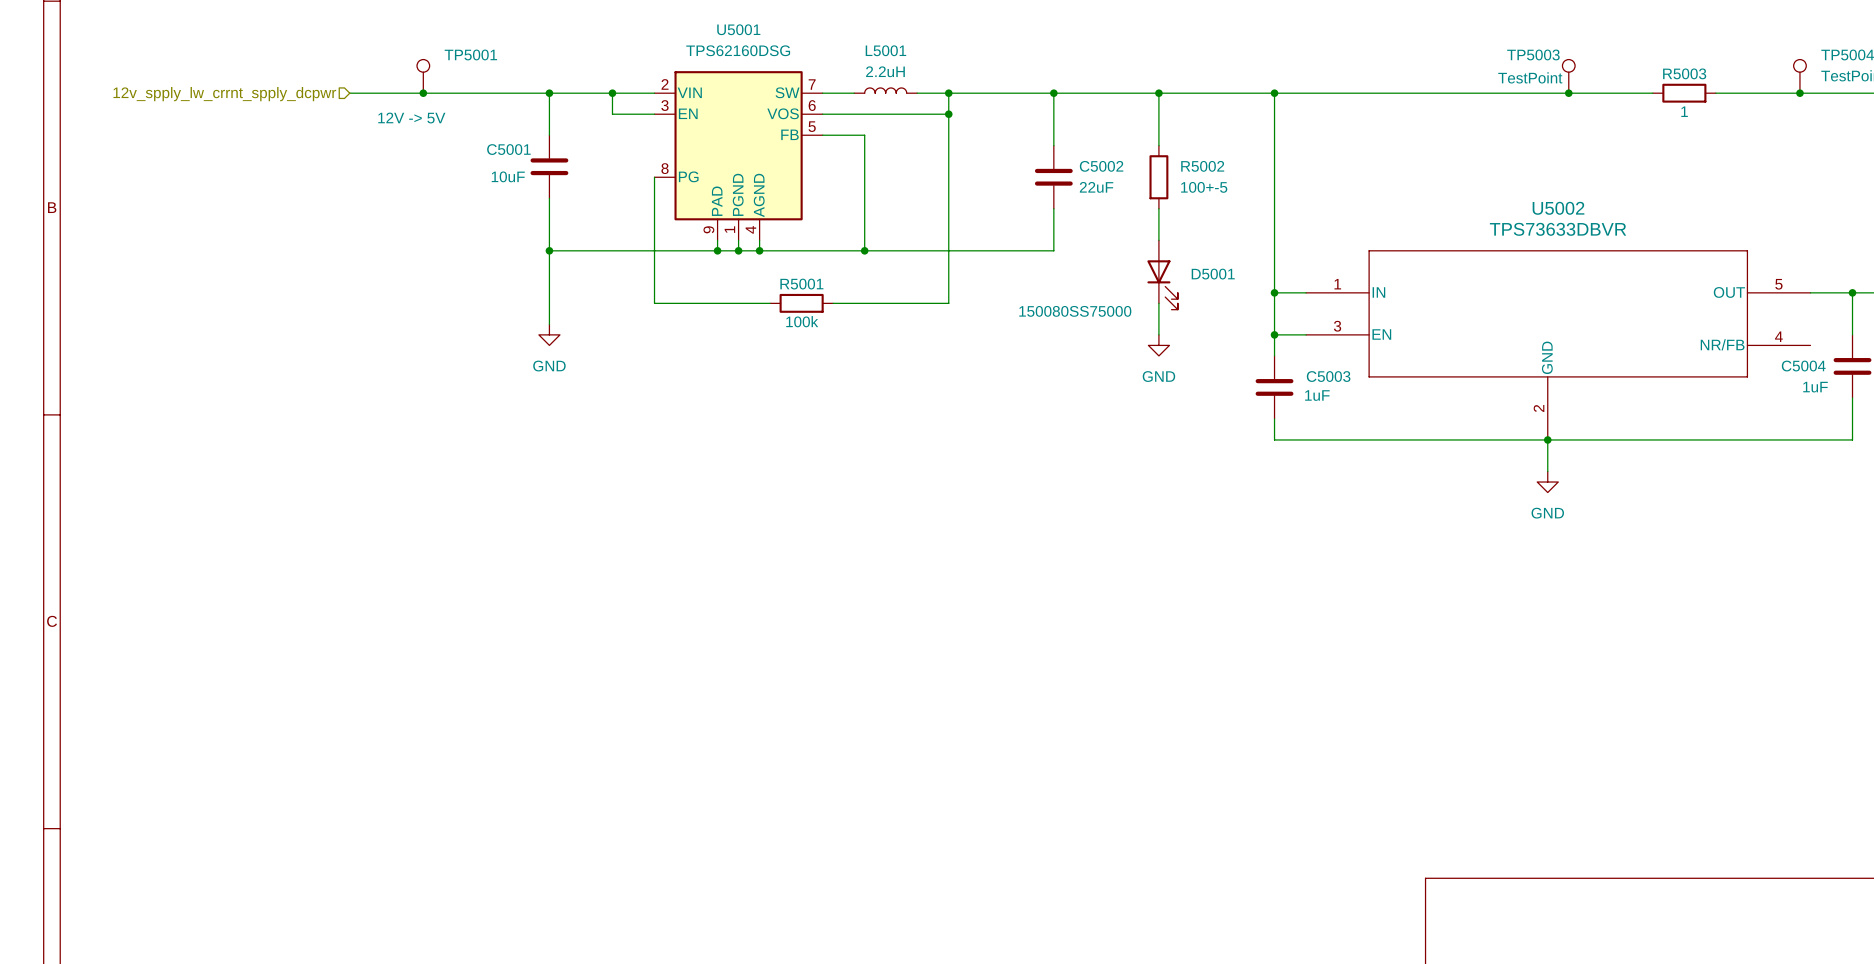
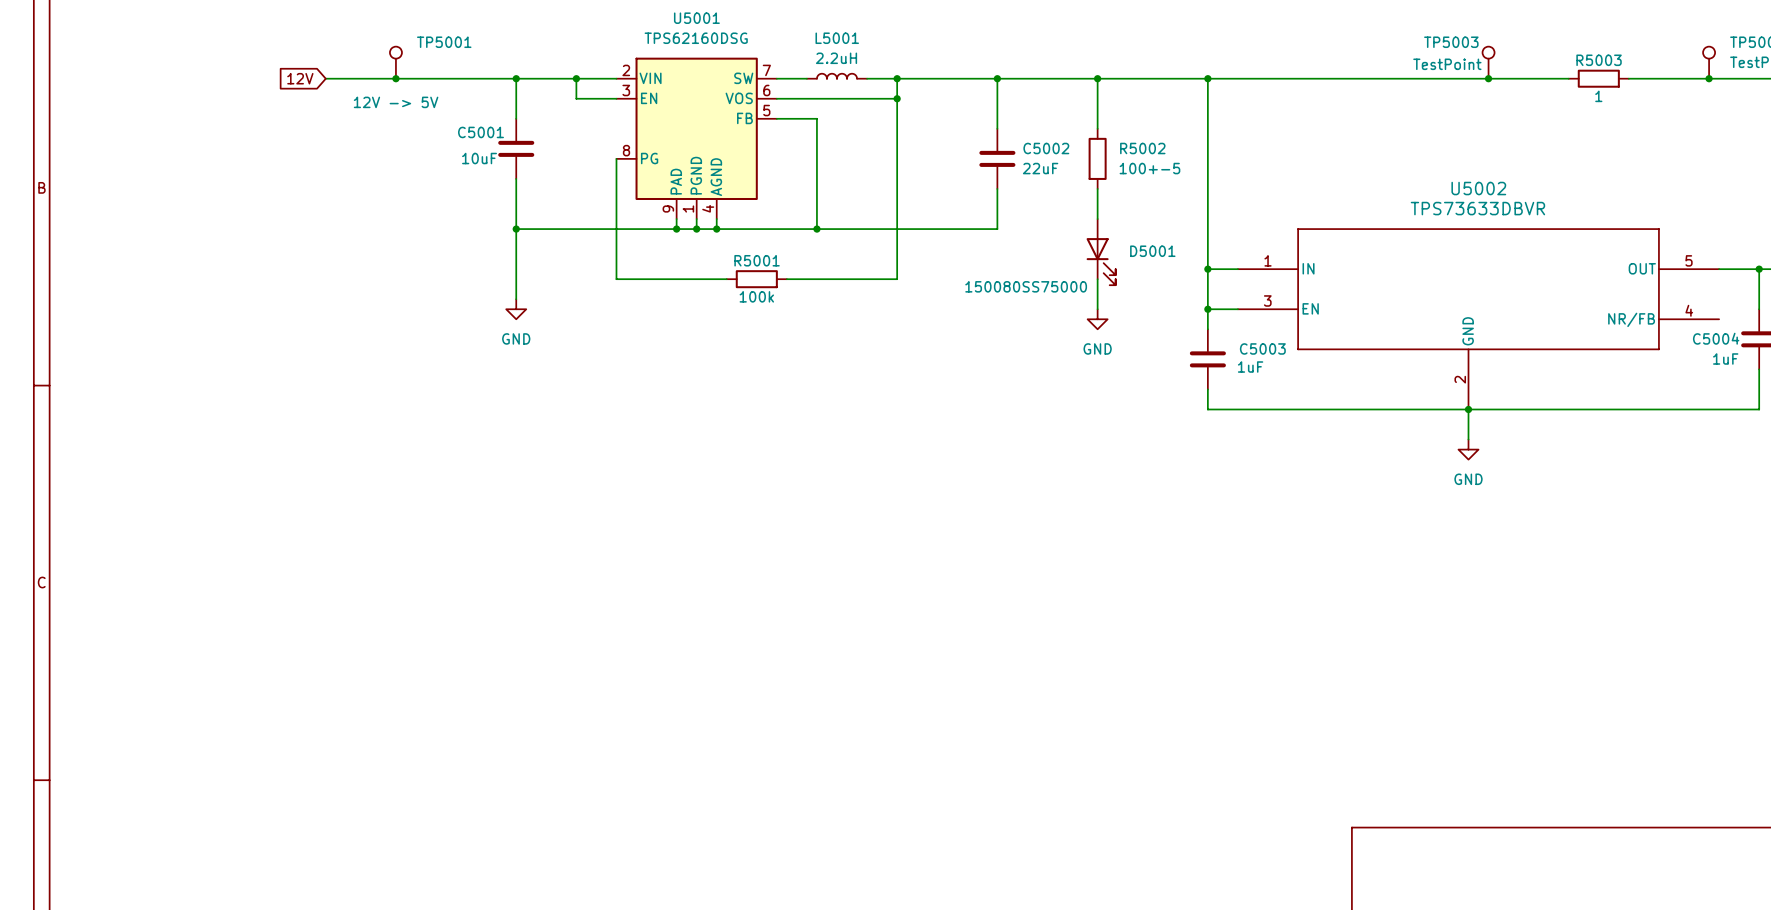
global label: none -> 12V (300, 78)
hierarchical label: 12v_spply_lw_crrnt_spply_dcpwr (224, 94) -> none

